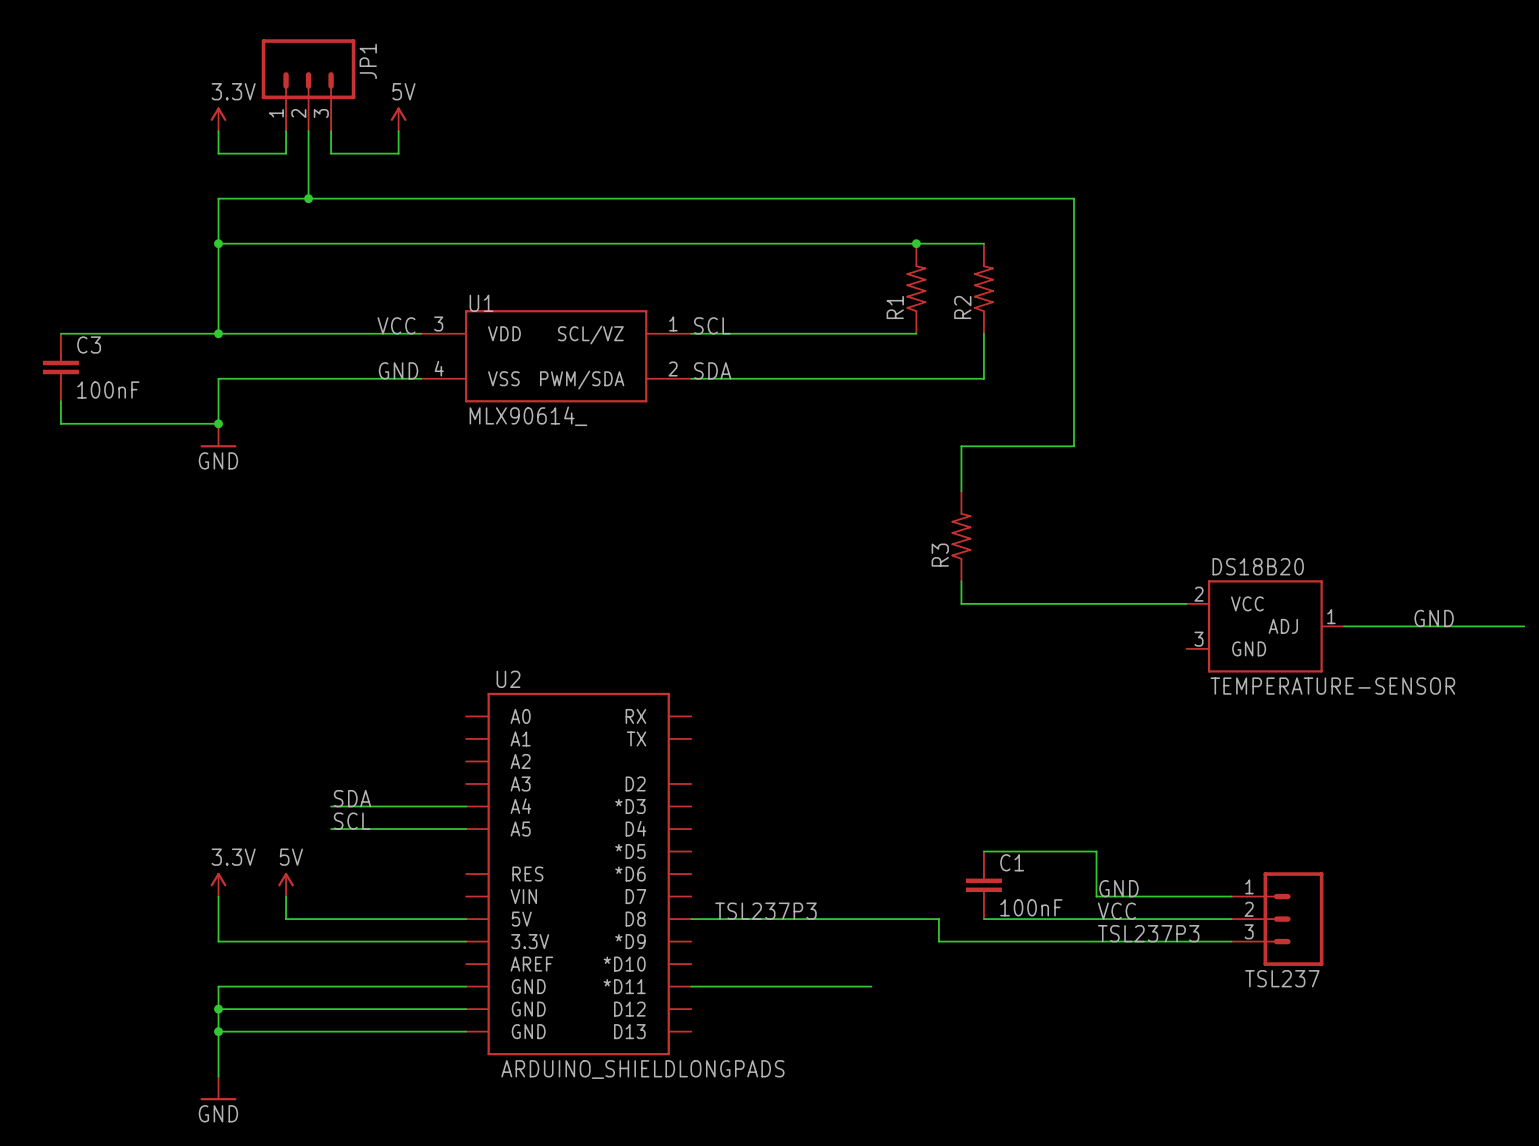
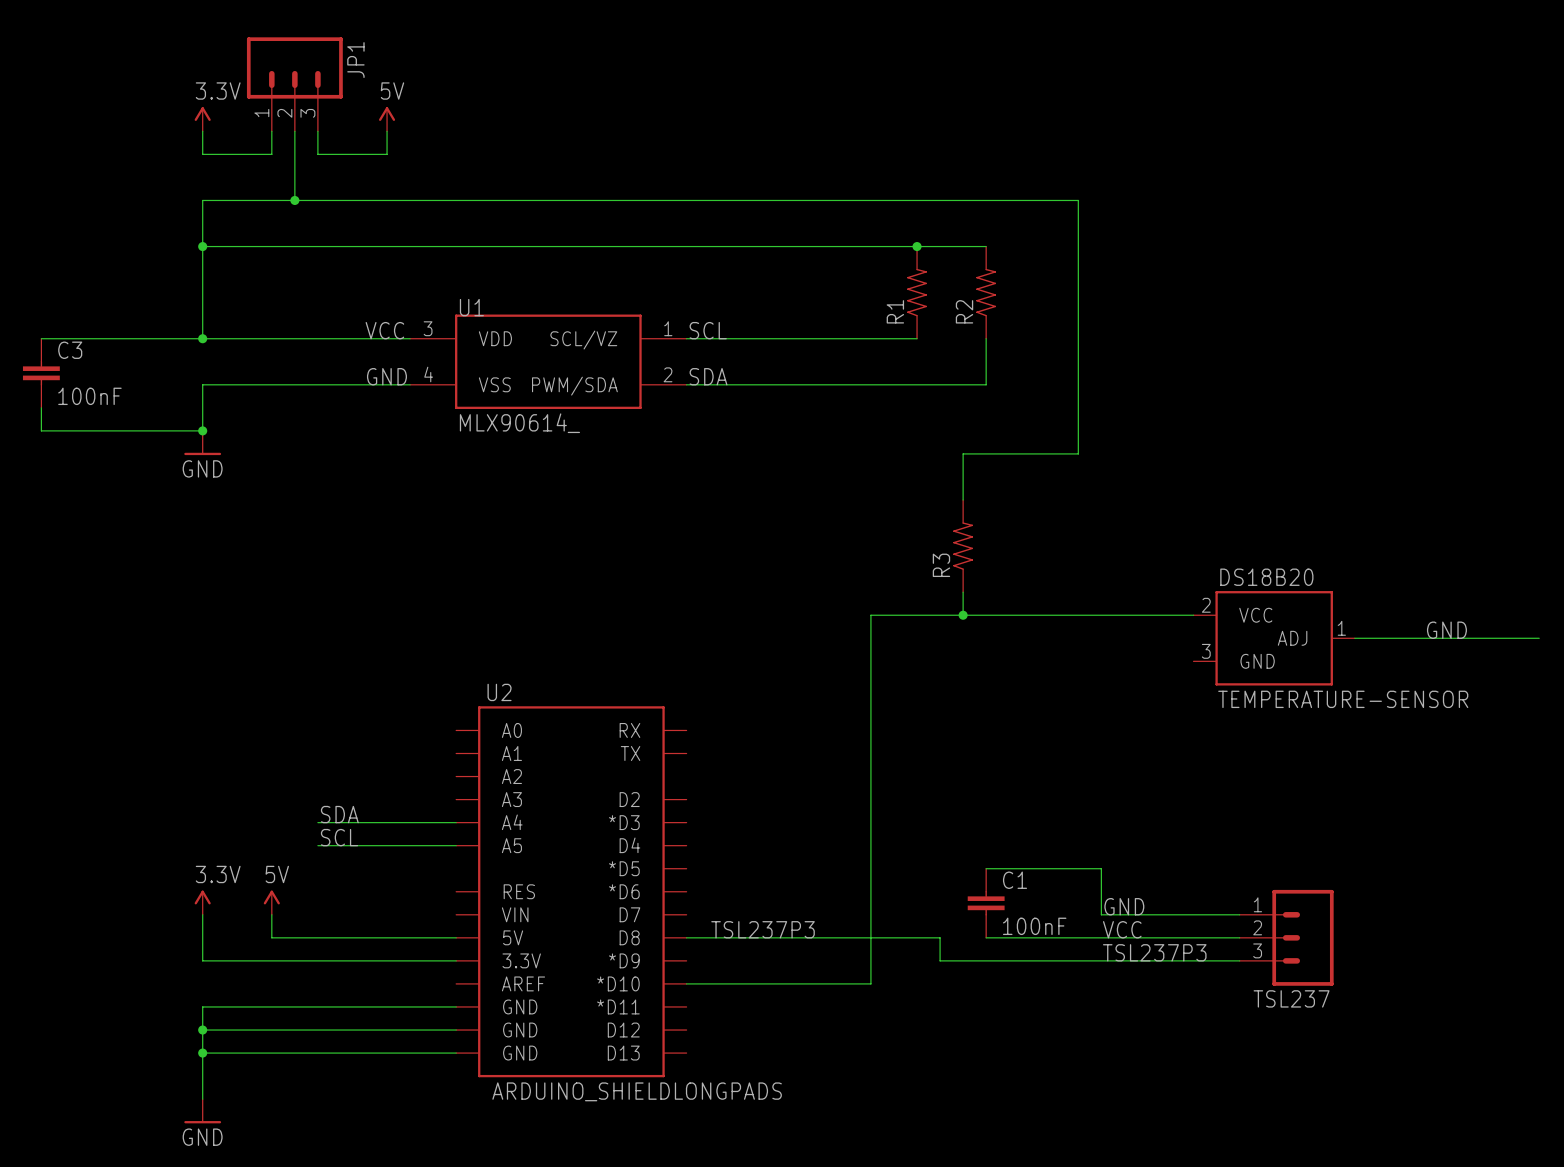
wire: none -> (963, 615) (870, 615) (870, 983) (686, 983)
junction: none -> (963, 615)
wire: (691, 986) (871, 986) -> none

